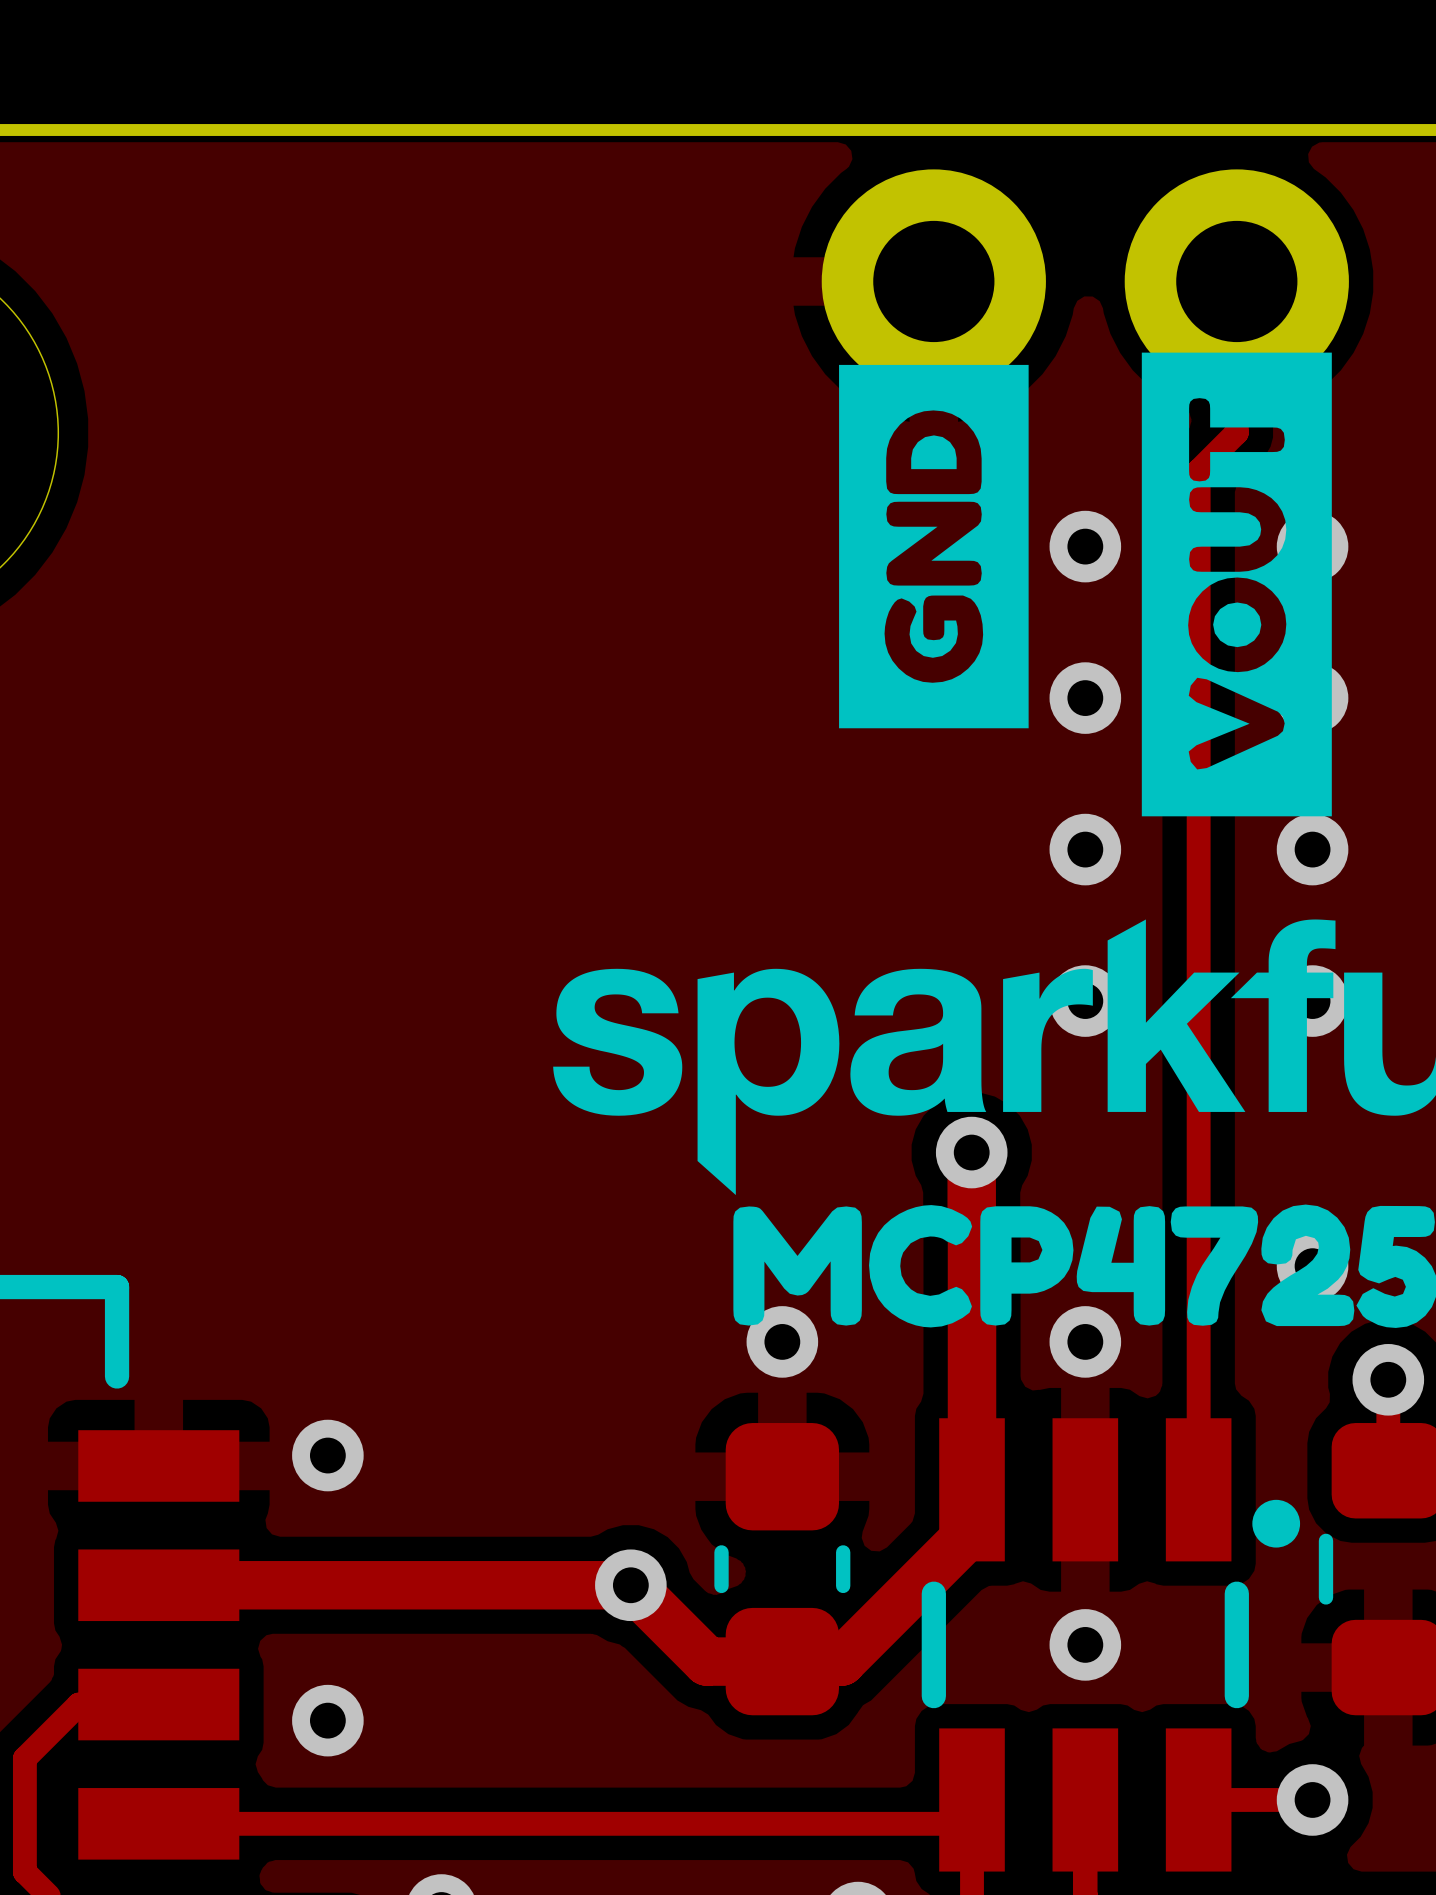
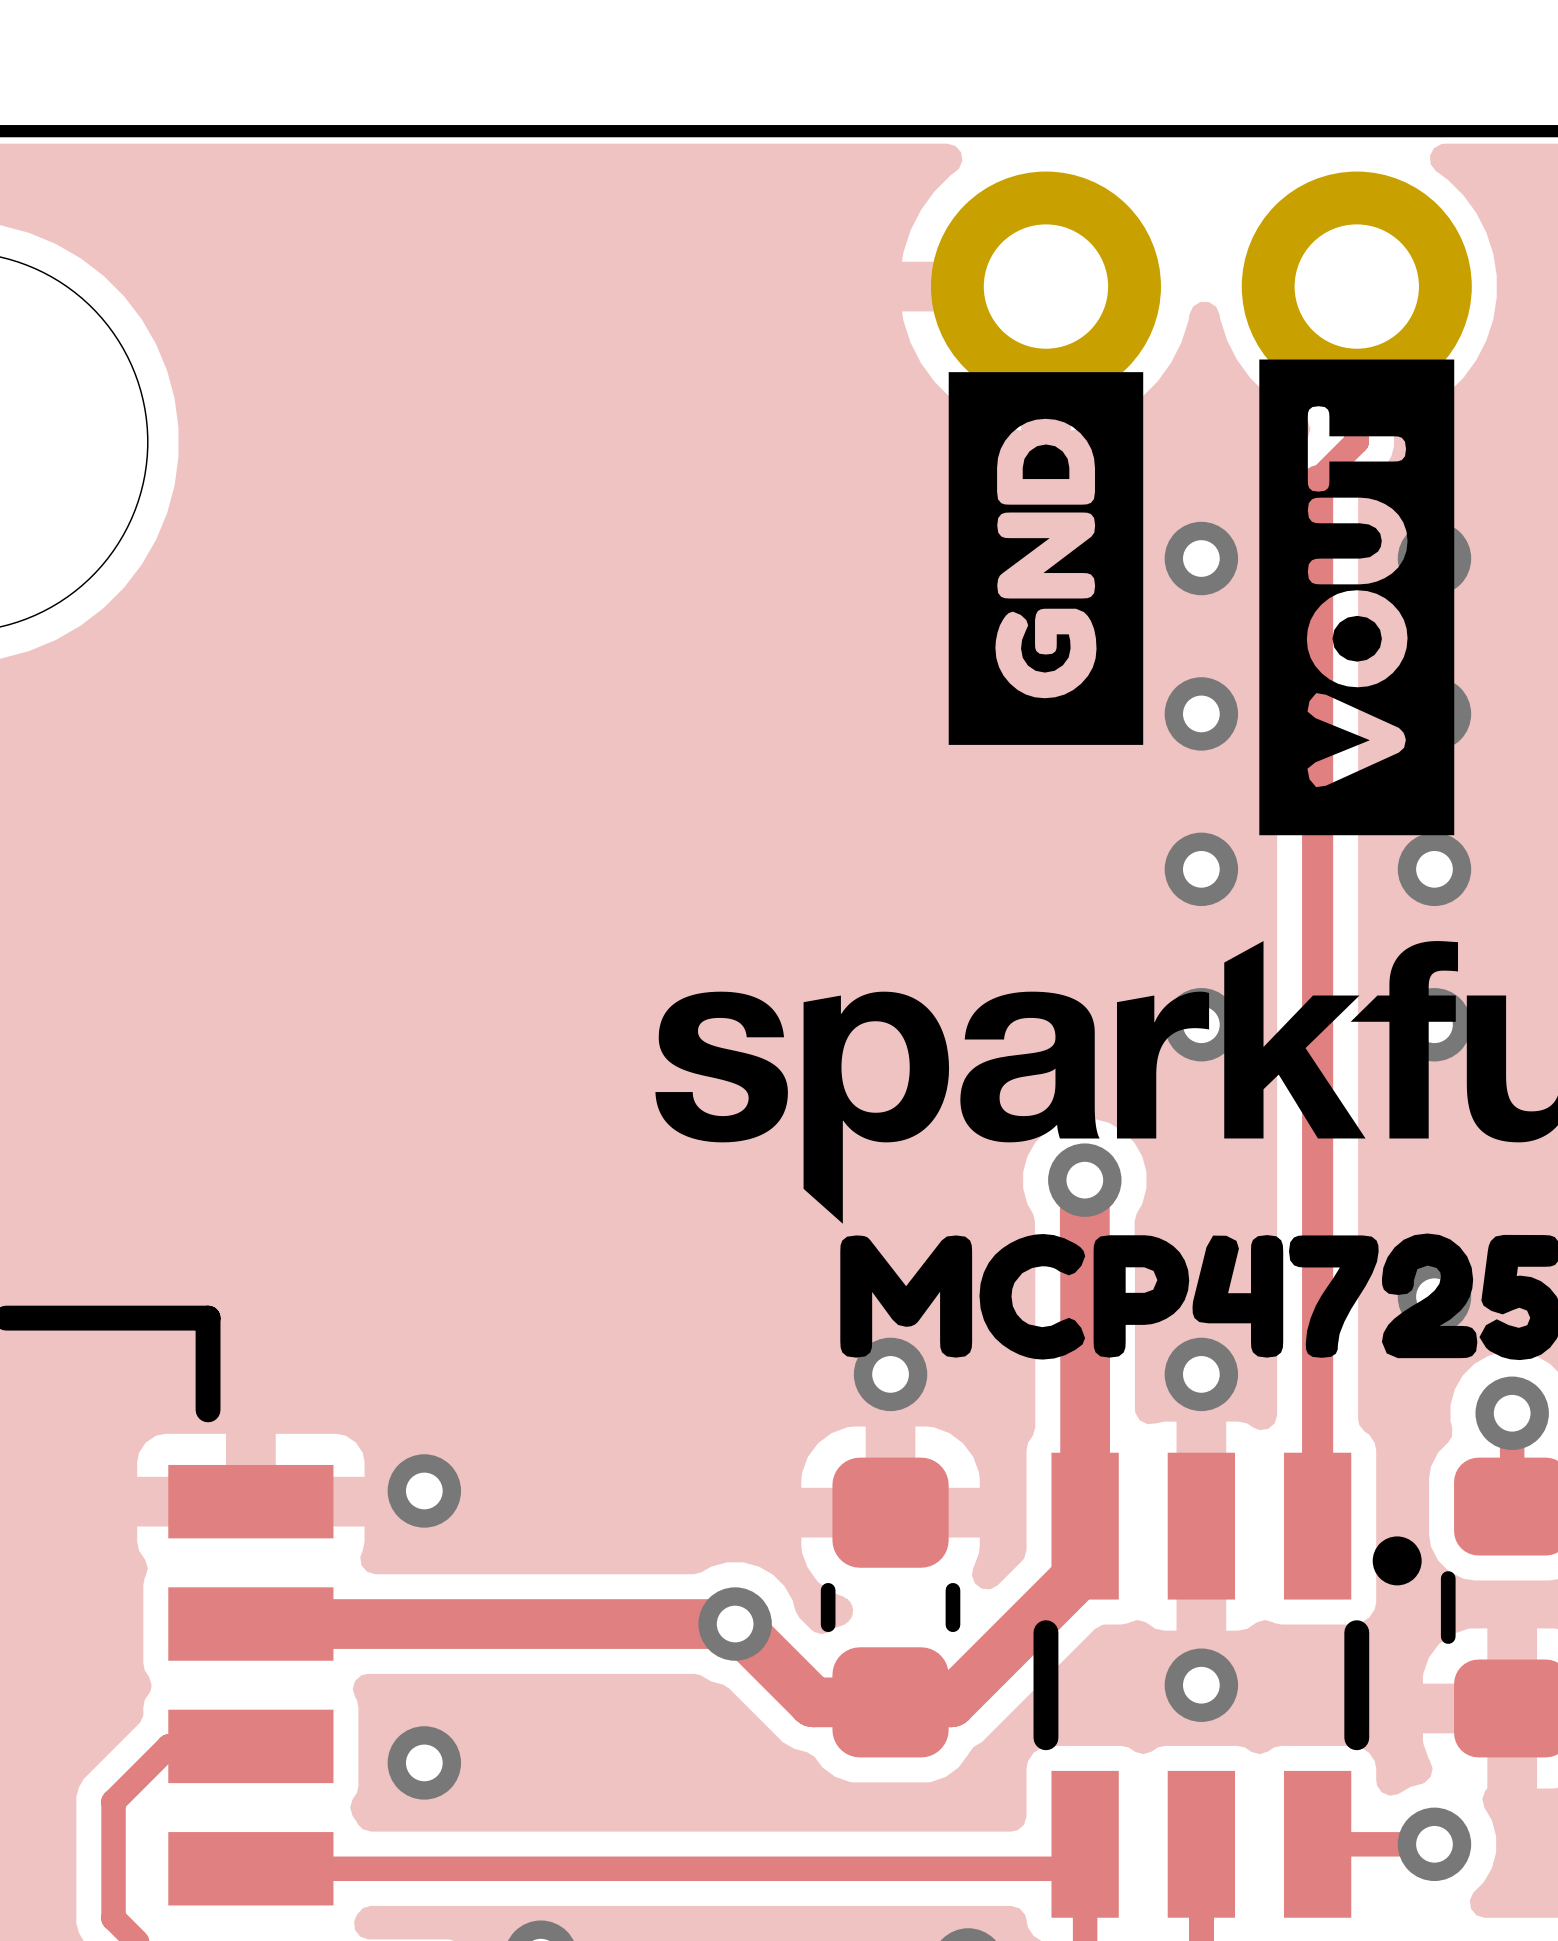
track width: thin (1198, 470) (1198, 1489) -> thick (1317, 480) (1317, 1526)

